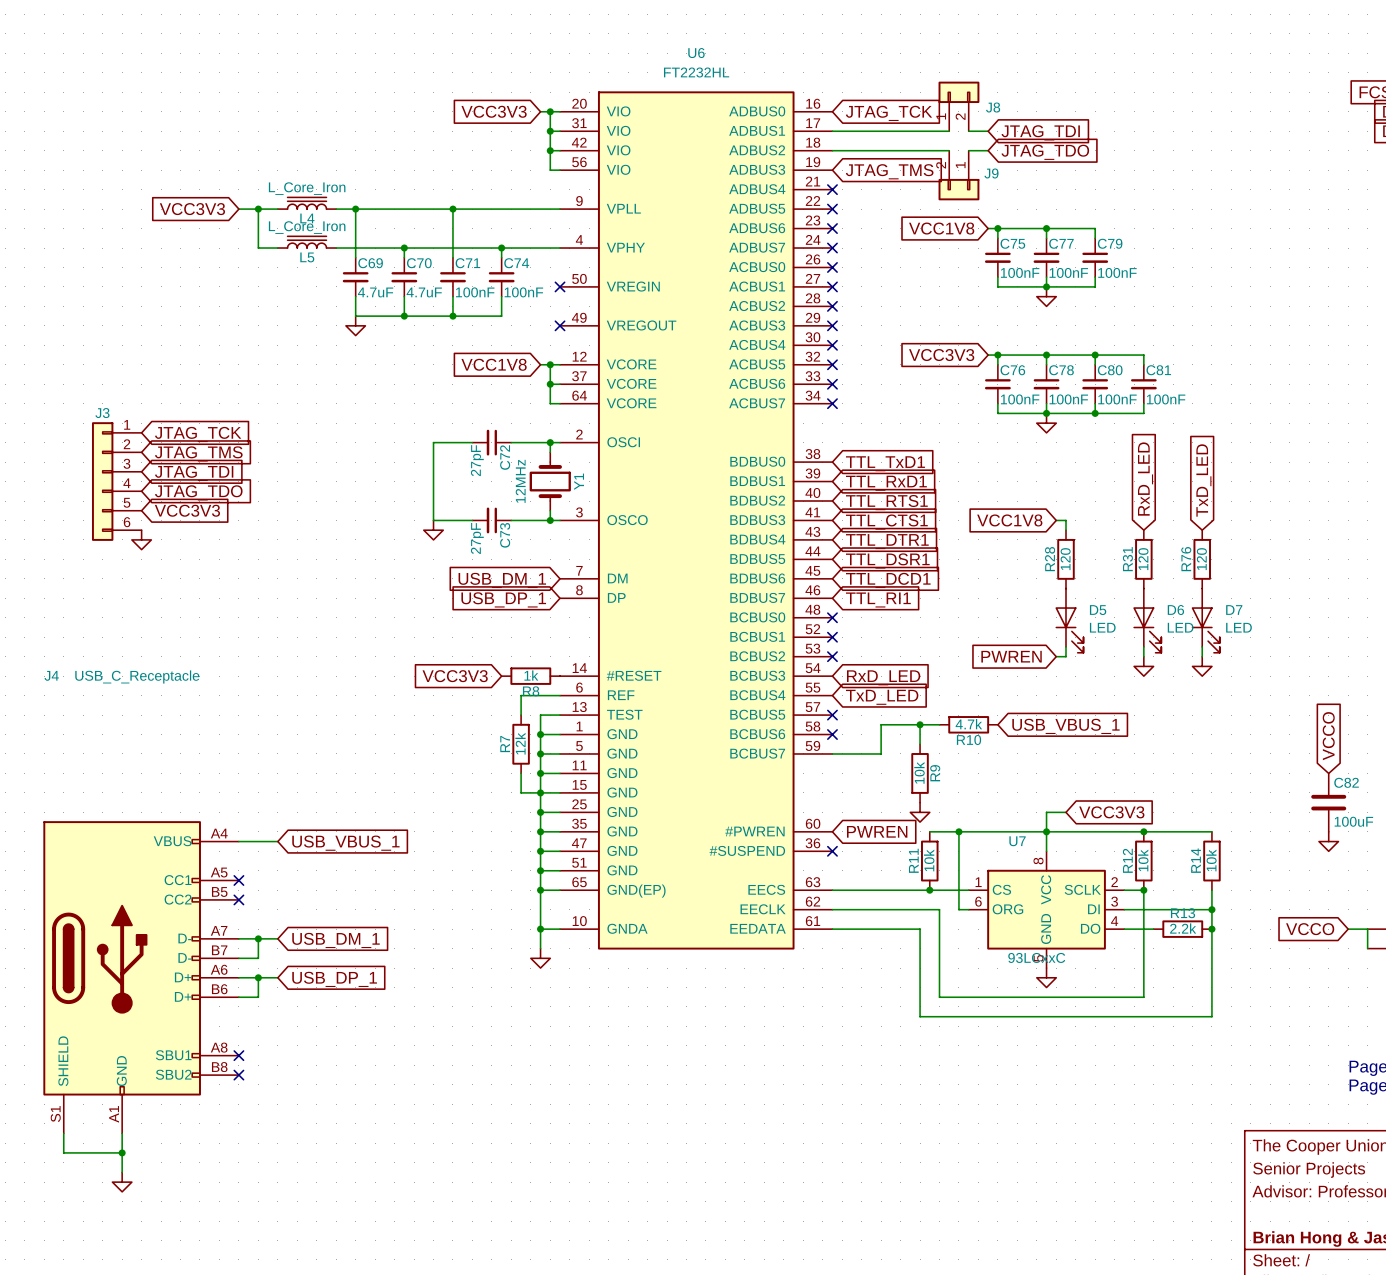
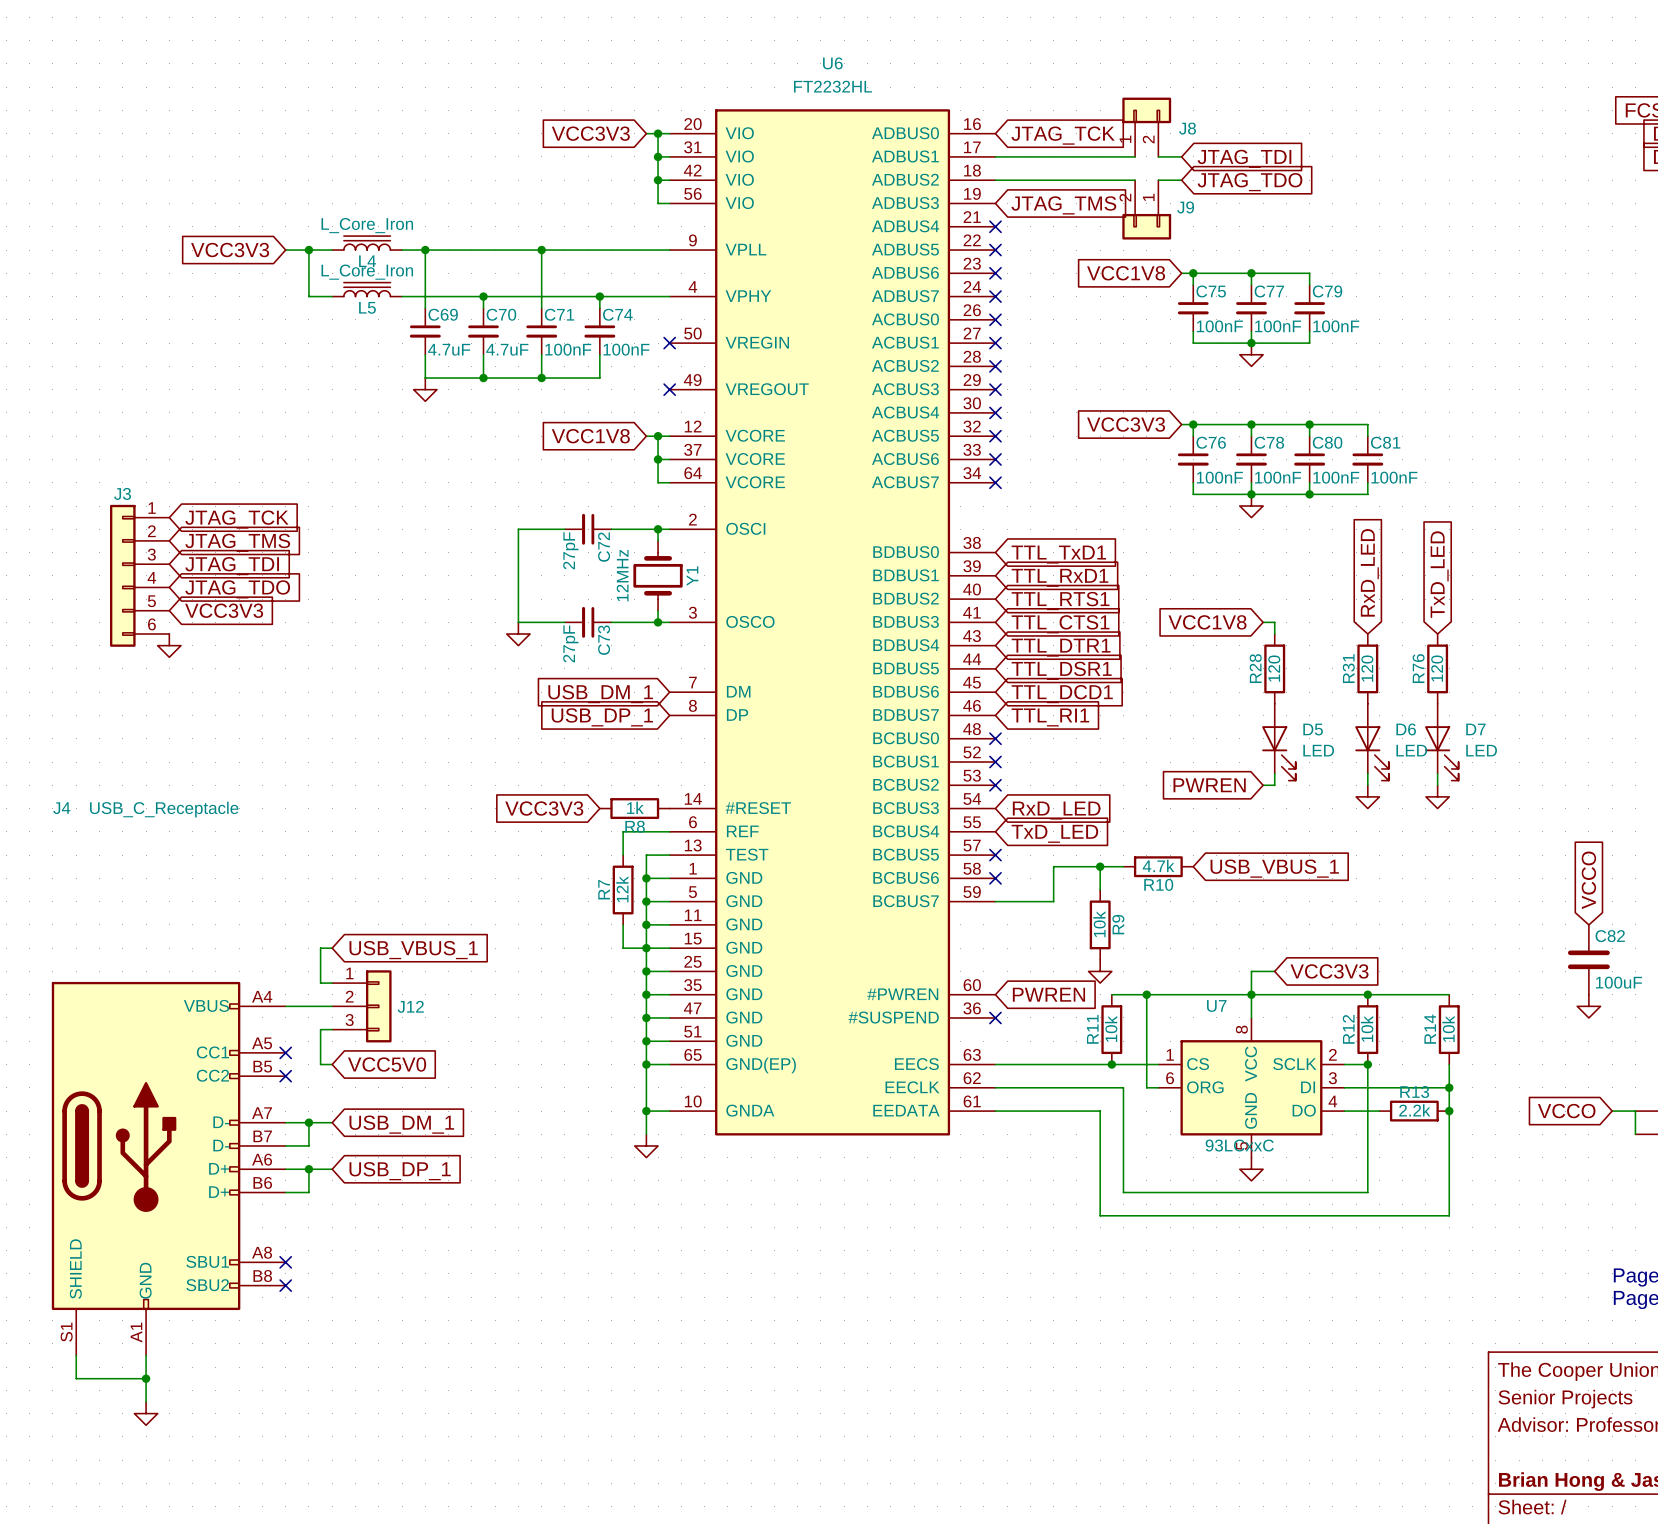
wire: none -> (332, 948) (320, 948) (320, 983) (332, 983)
J12: none -> (361, 1006)
global label position: USB_VBUS_1 (345, 843) -> USB_VBUS_1 (413, 950)
wire: none -> (332, 1029) (320, 1029) (320, 1064) (332, 1064)
global label: none -> VCC5V0 (387, 1064)

